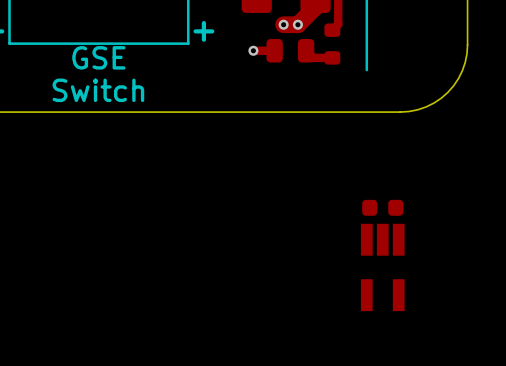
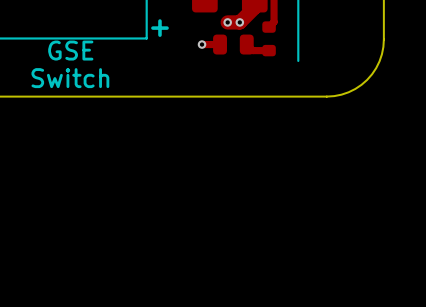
part: (382, 207) -> none
part: (382, 267) -> none

